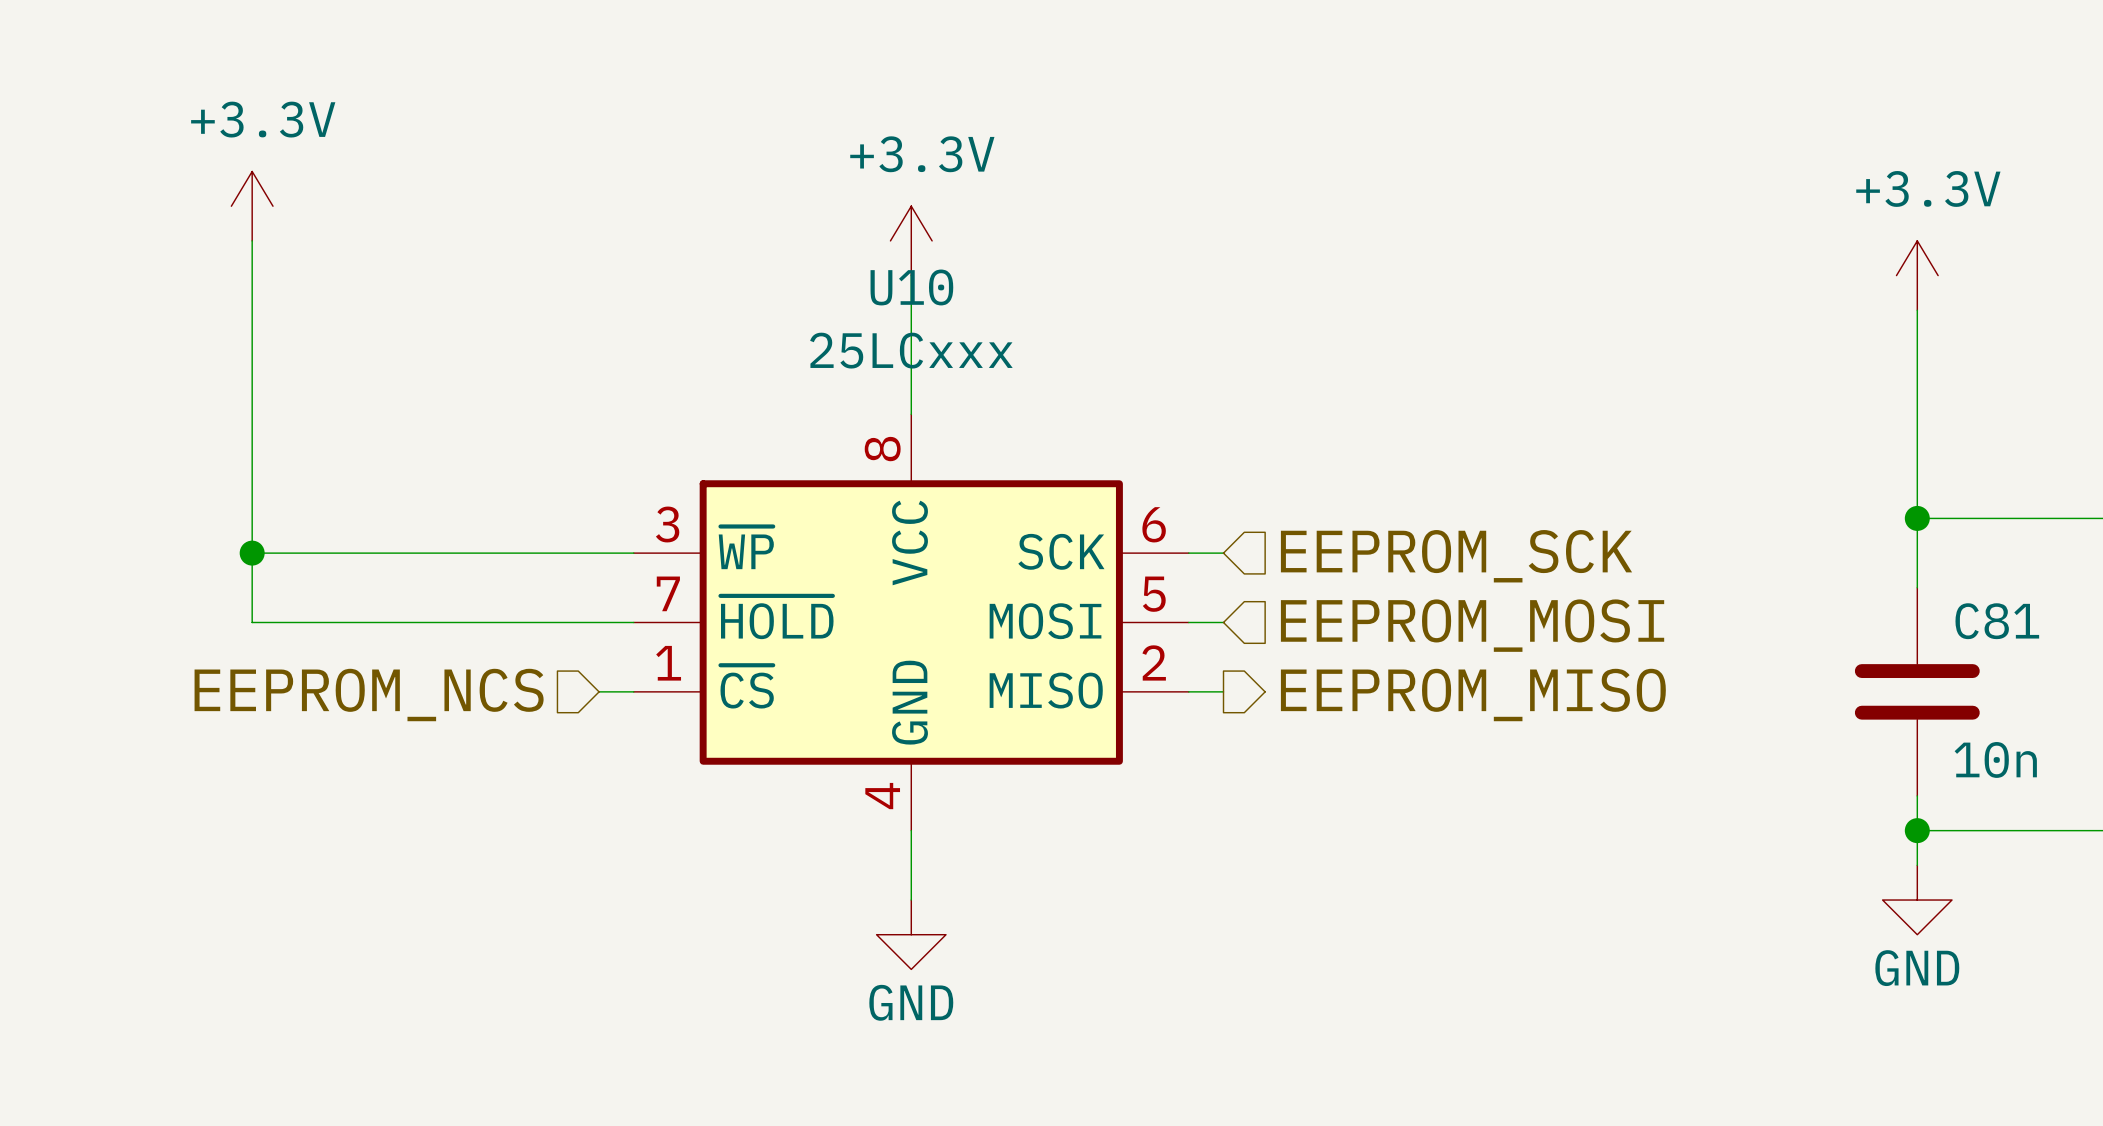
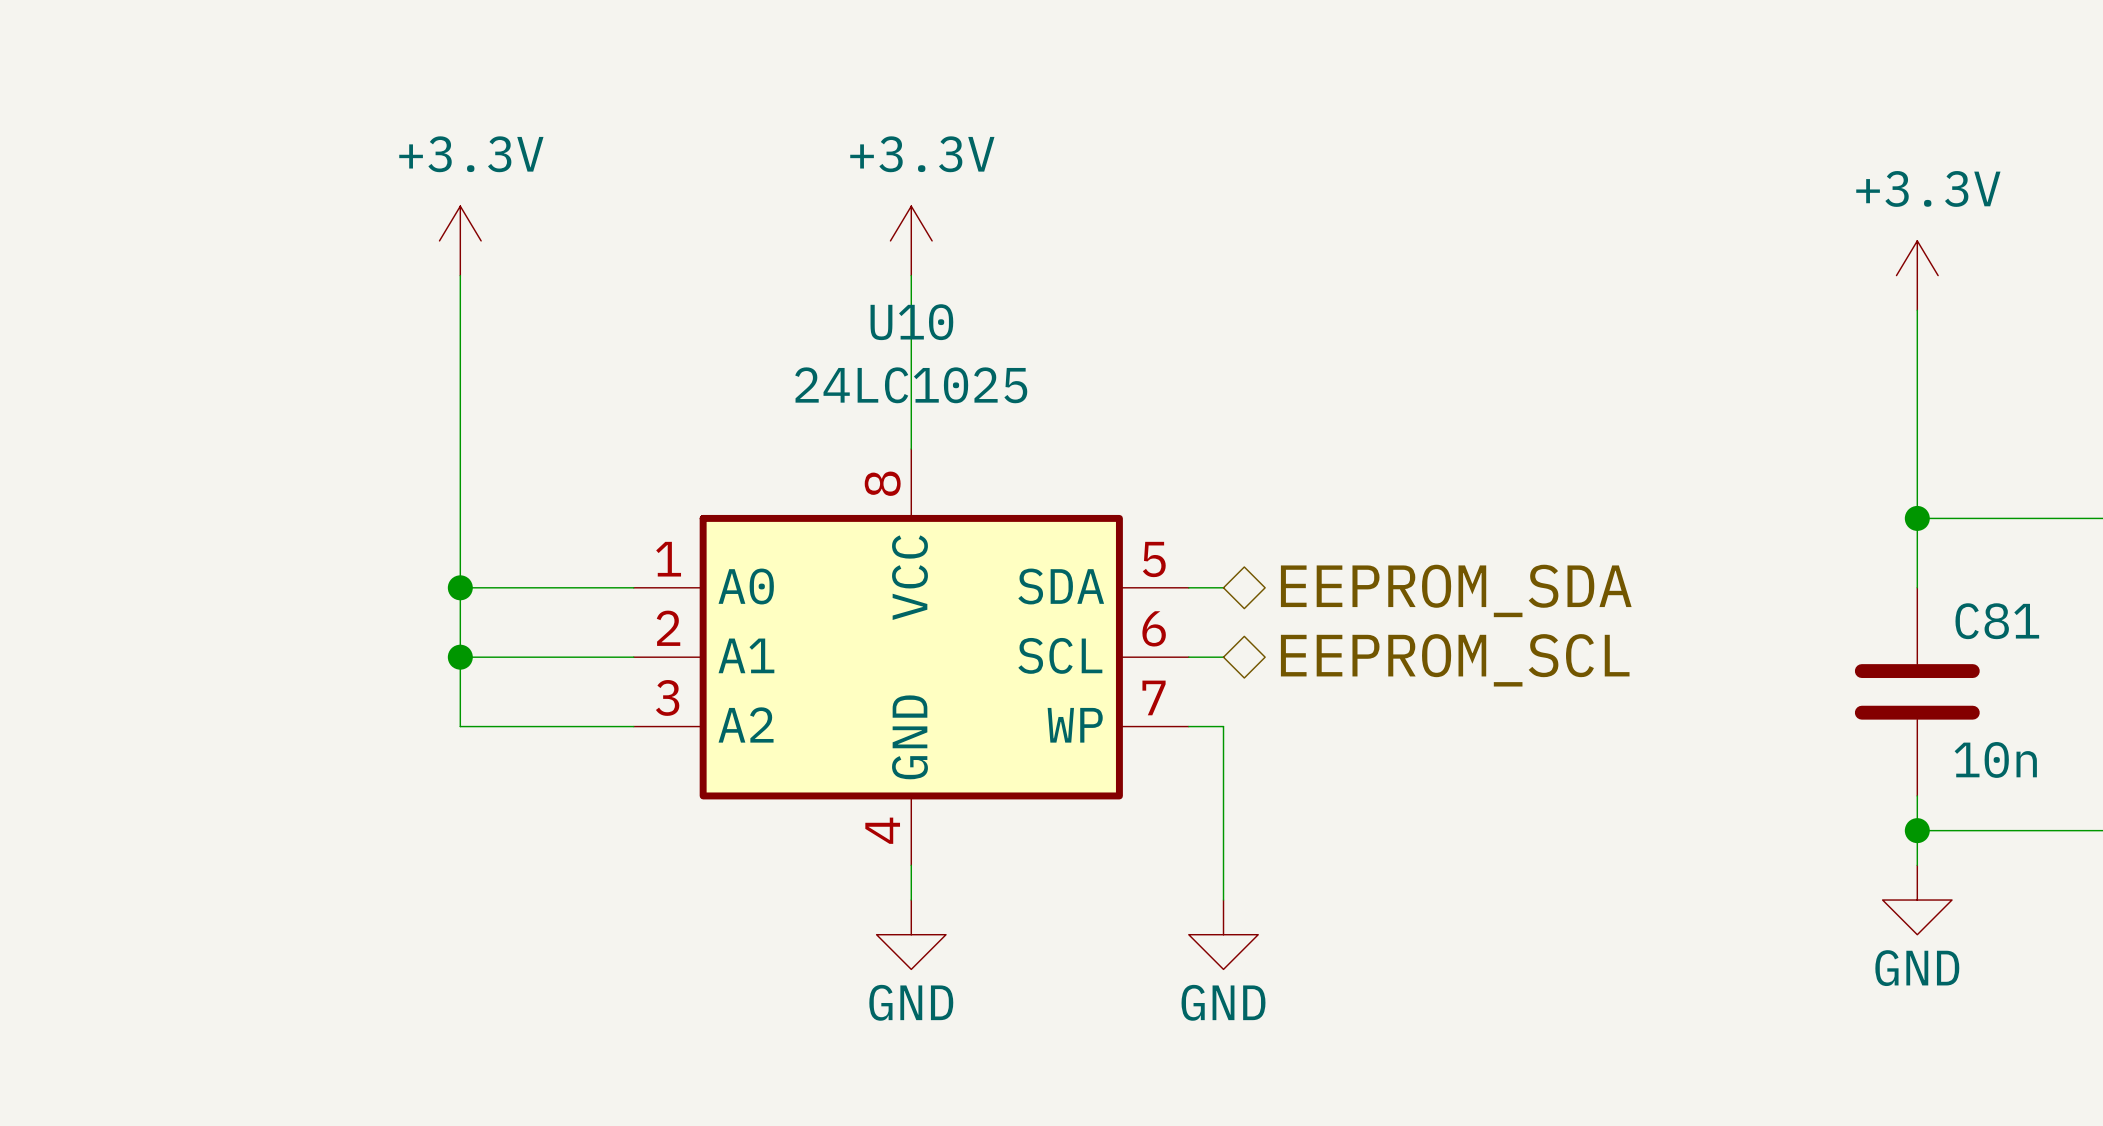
power symbol position: +3.3V (252, 206) -> +3.3V (460, 240)
wire: (252, 240) (252, 622) (633, 622) -> none
wire: none -> (460, 275) (460, 726) (633, 726)
U10 value: 25LCxxx (911, 350) -> 24LC1025 (911, 385)
U10 symbol: [633, 414, 1189, 831] -> [633, 449, 1189, 866]
wire: (252, 553) (633, 553) -> none
junction: (252, 553) -> none
wire: (1188, 553) (1223, 553) -> (1188, 587) (1223, 587)
hierarchical label: EEPROM_SCK (1456, 556) -> none
wire: none -> (460, 587) (633, 587)
junction: none -> (460, 587)
hierarchical label: none -> EEPROM_SDA (1456, 590)
wire: (1188, 622) (1223, 622) -> (1188, 657) (1223, 657)
hierarchical label: EEPROM_MOSI (1472, 625) -> none
wire: none -> (460, 657) (633, 657)
junction: none -> (460, 657)
hierarchical label: none -> EEPROM_SCL (1455, 660)
wire: (599, 691) (633, 691) -> none
wire: (1188, 691) (1223, 691) -> none
hierarchical label: EEPROM_NCS (369, 695) -> none
hierarchical label: EEPROM_MISO (1473, 695) -> none
wire: none -> (1188, 726) (1223, 726) (1223, 900)
power symbol: none -> GND (1223, 934)

